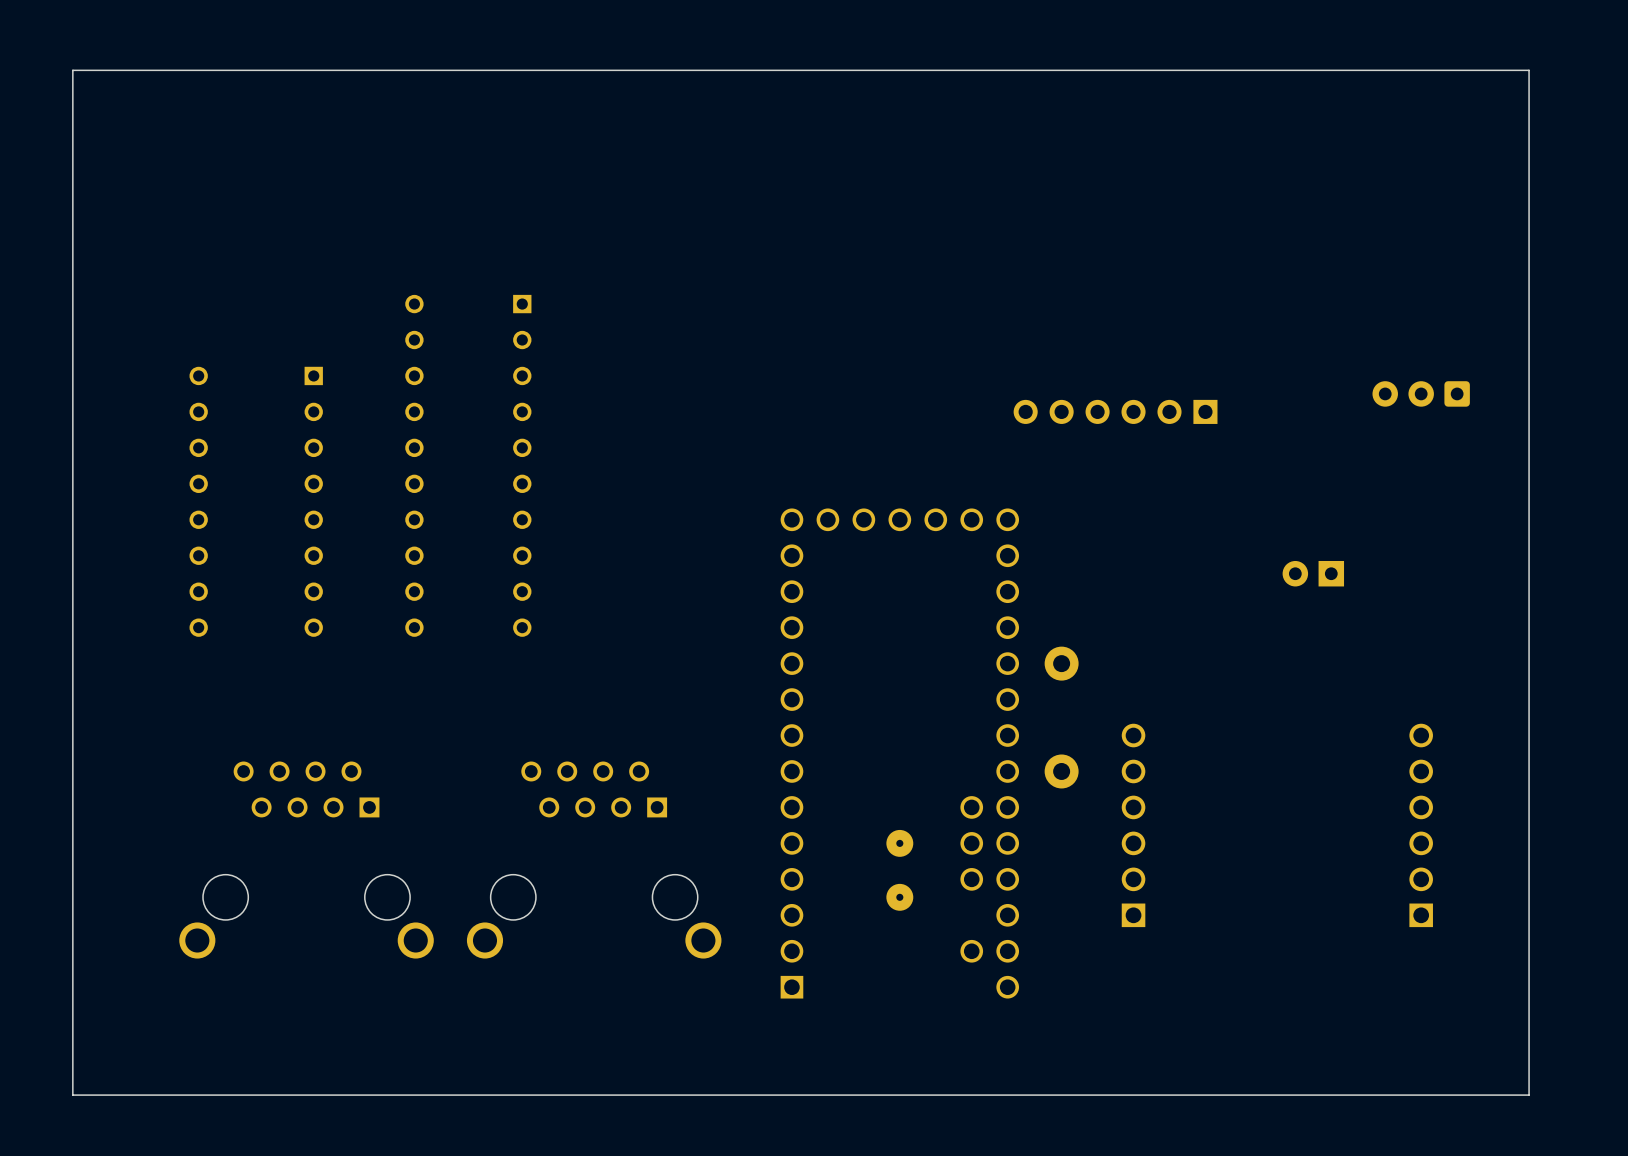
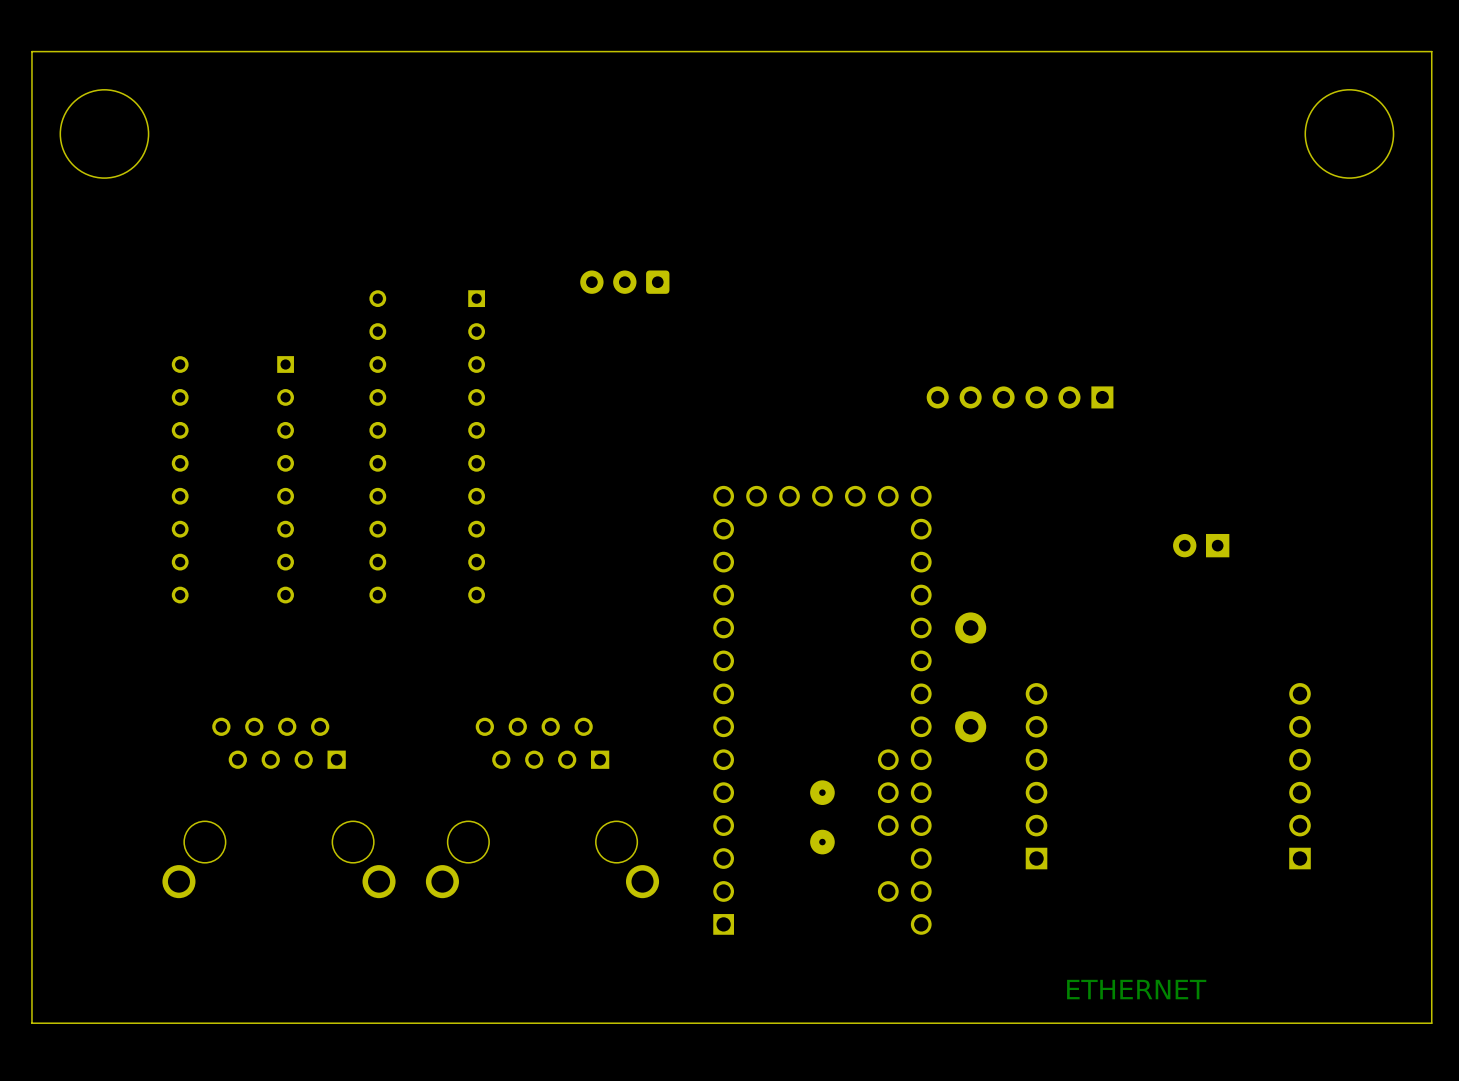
round board edge: none -> [59, 89, 149, 179]
round board edge: none -> [1304, 89, 1394, 179]
part: none -> (624, 282)
part: (1421, 393) -> none
text: none -> ETHERNET (1136, 989)
board edge: (1529, 1095) (1529, 70) (72, 70) (72, 1095) -> (1398, 1023) (1431, 1023) (1431, 51) (31, 51) (31, 1023) (64, 1023)

